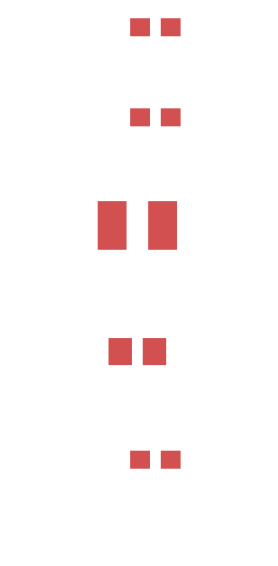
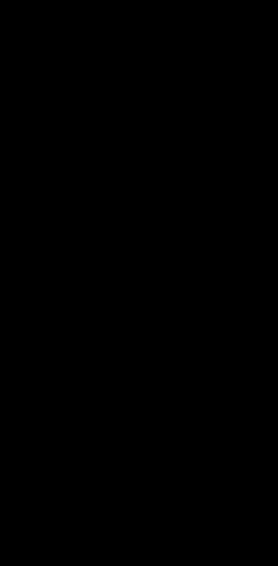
part: (155, 27) -> none
part: (155, 117) -> none
part: (137, 225) -> none
part: (137, 351) -> none
part: (155, 459) -> none

